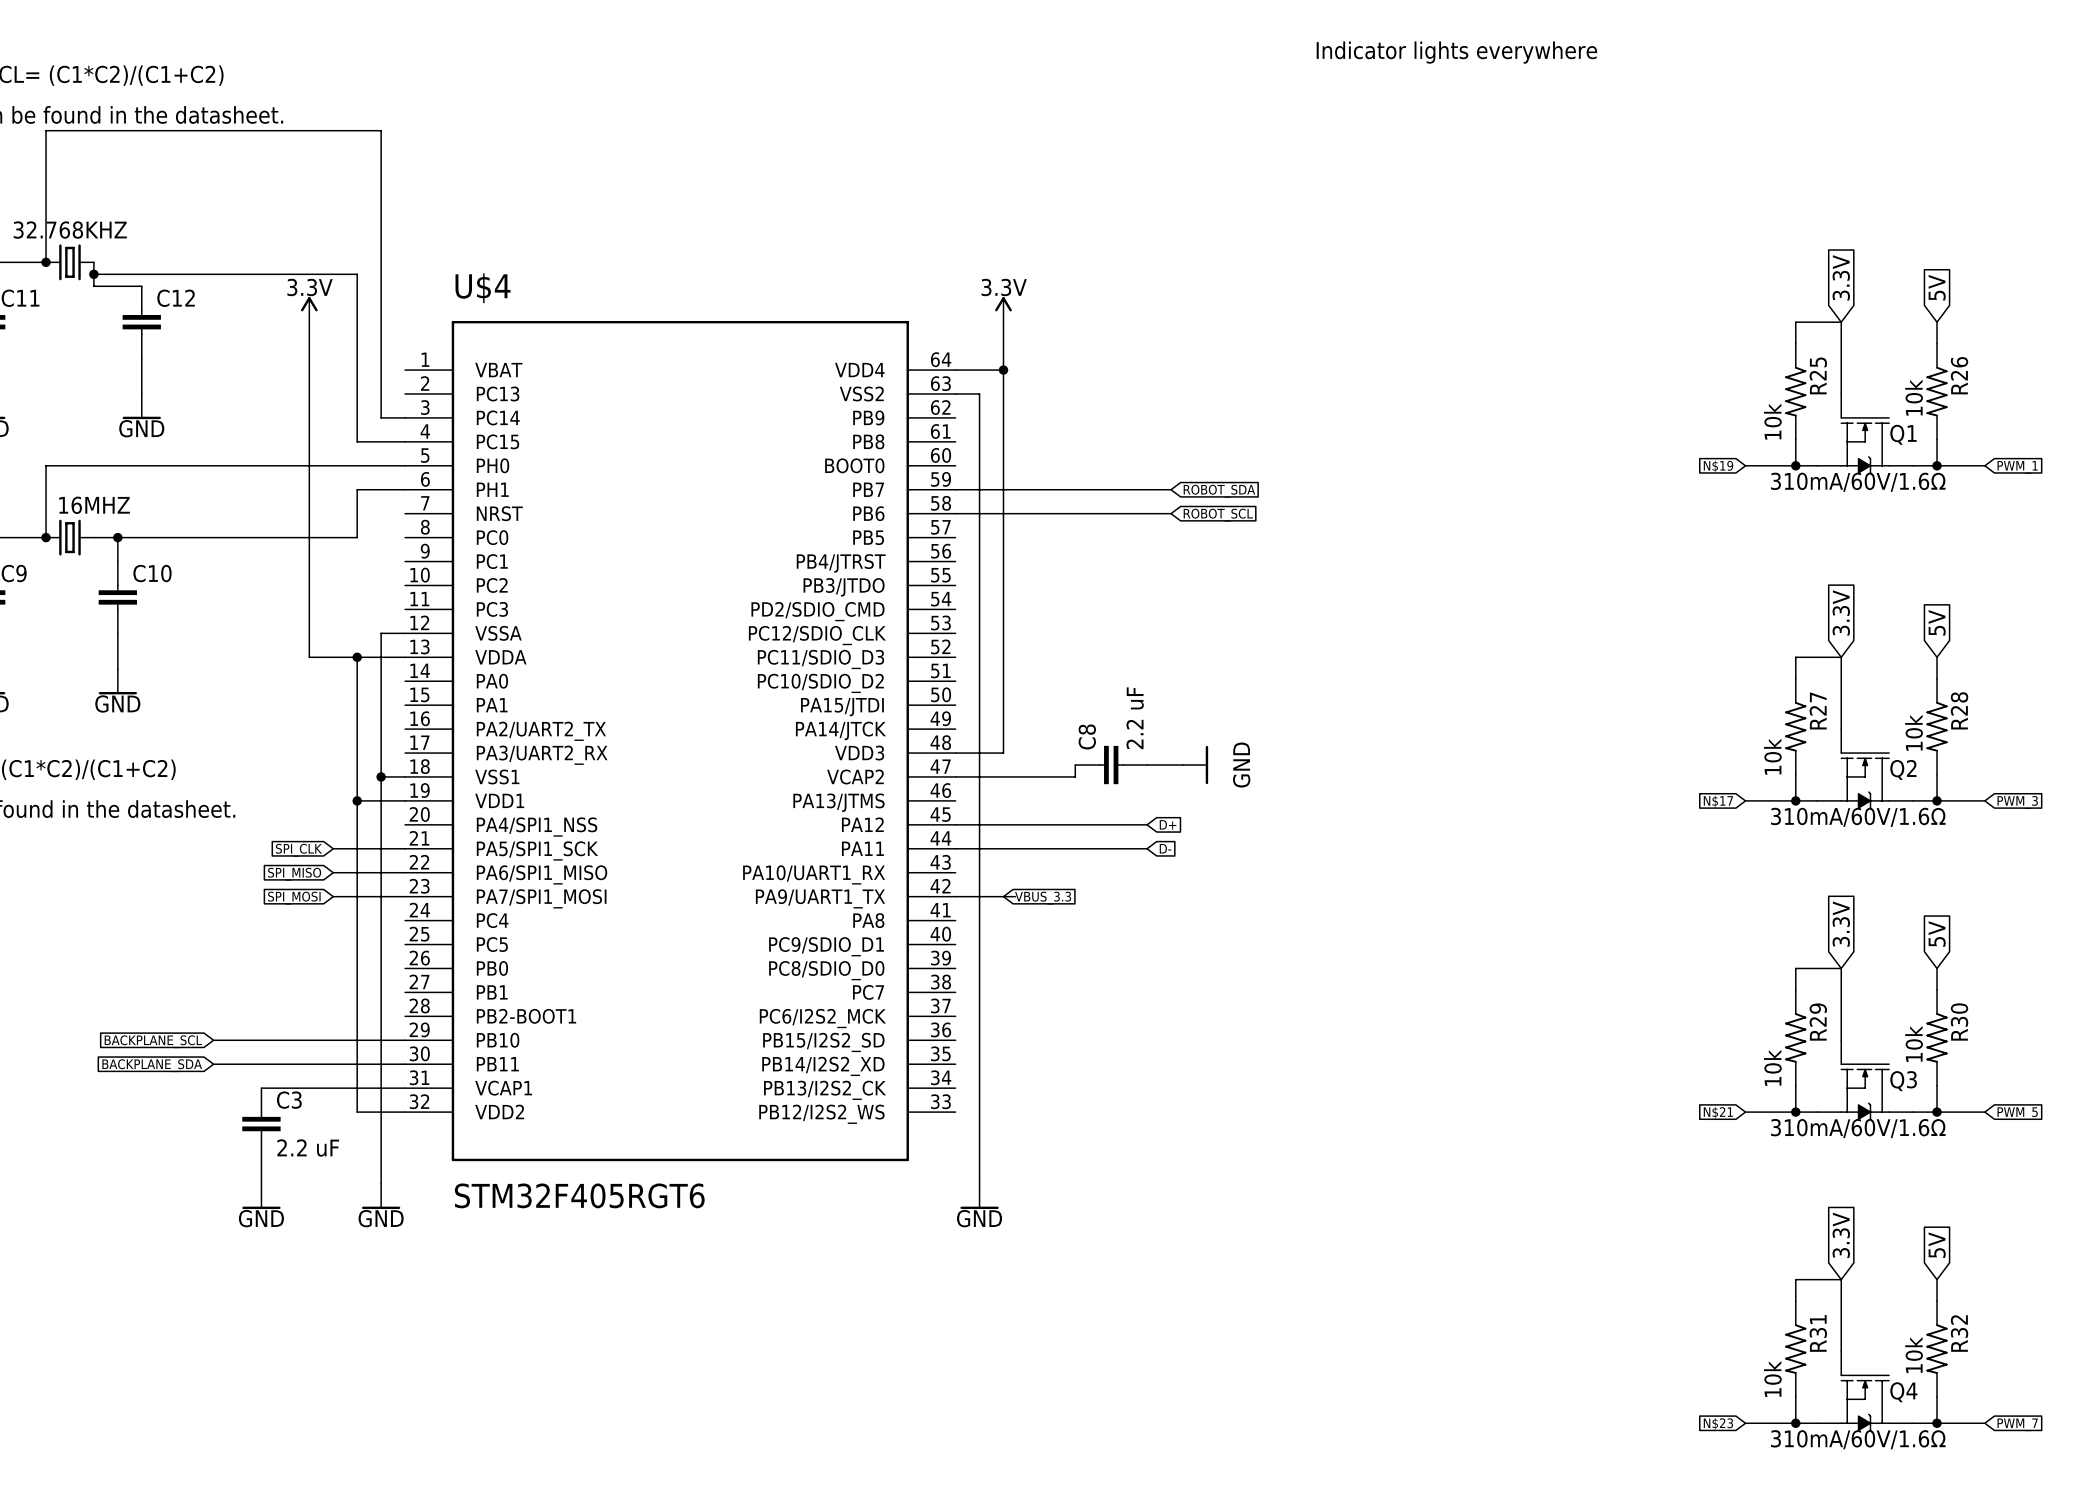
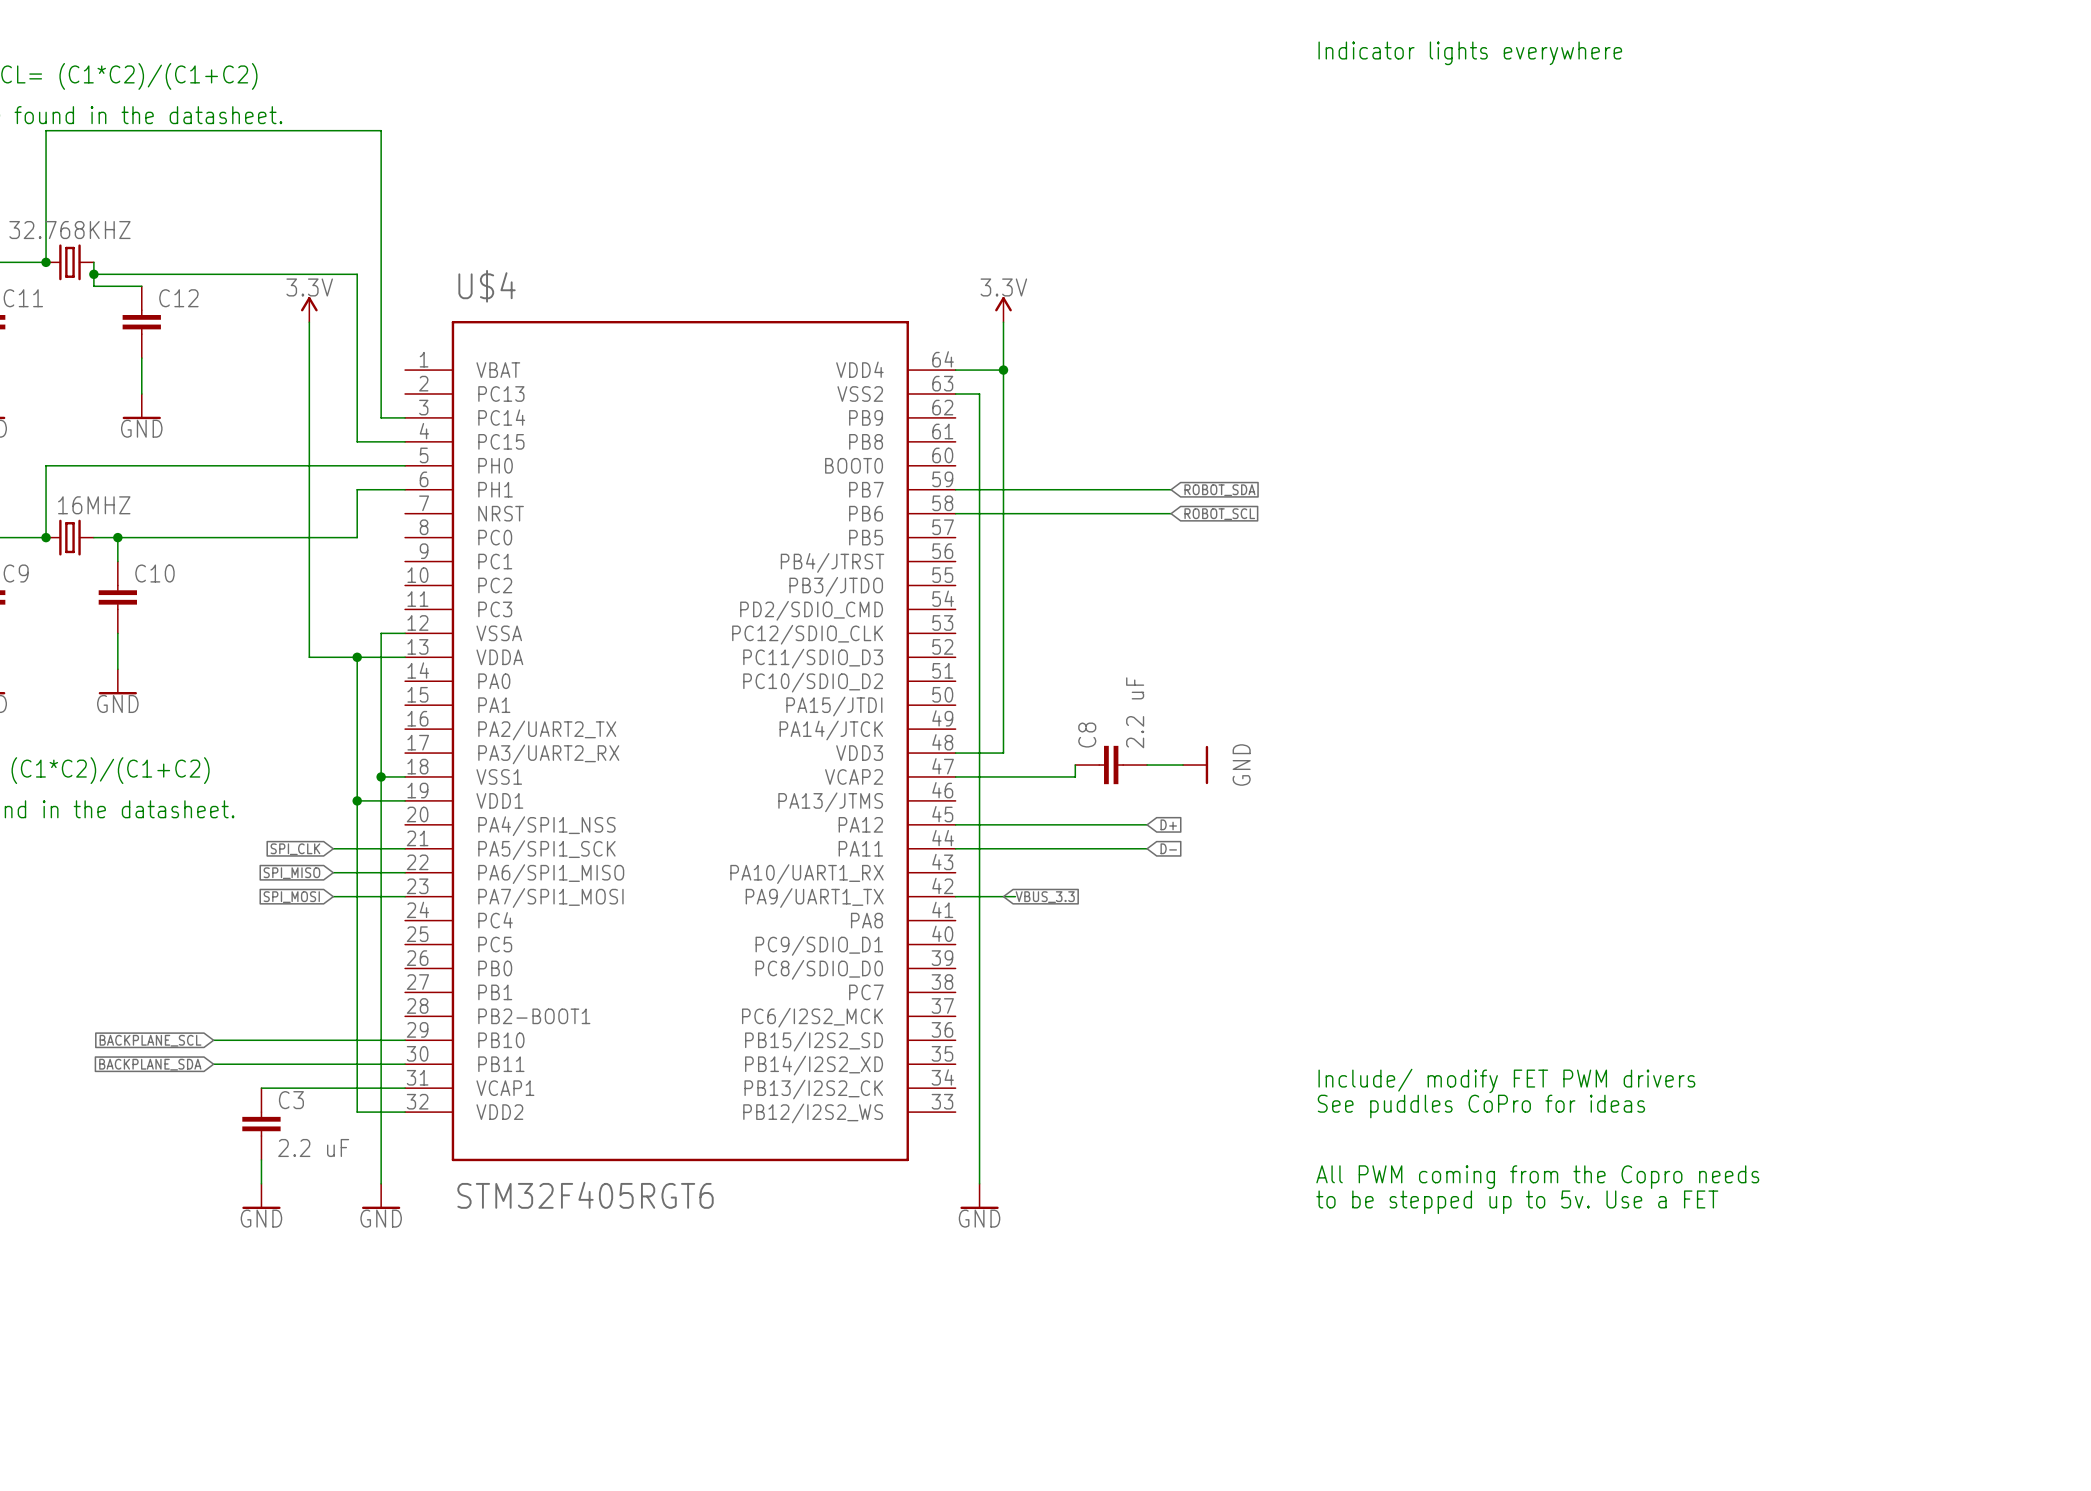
global label: 3.3V (1841, 277) -> none
global label: 5V (1937, 287) -> none
wire: (1937, 322) (1937, 343) -> none
wire: (1795, 343) (1795, 322) (1841, 322) (1841, 393) -> none
R25: 10k (1795, 391) -> none
R26: 10k (1937, 391) -> none
Q1: 310mA/60V/1.6Ω (1865, 434) -> none
wire: (1795, 439) (1795, 465) -> none
wire: (1937, 439) (1937, 465) -> none
wire: (1745, 465) (1817, 465) -> none
junction: (1795, 465) -> none
wire: (1913, 465) (1984, 465) -> none
junction: (1937, 465) -> none
global label: N$19 (1718, 466) -> none
global label: PWM_1 (2017, 467) -> none
global label: 3.3V (1841, 612) -> none
global label: 5V (1937, 622) -> none
wire: (1937, 657) (1937, 678) -> none
wire: (1795, 678) (1795, 657) (1841, 657) (1841, 729) -> none
R27: 10k (1795, 726) -> none
R28: 10k (1937, 726) -> none
Q2: 310mA/60V/1.6Ω (1865, 769) -> none
wire: (1795, 774) (1795, 800) -> none
wire: (1937, 774) (1937, 800) -> none
wire: (1745, 800) (1817, 800) -> none
junction: (1795, 800) -> none
wire: (1913, 800) (1984, 800) -> none
junction: (1937, 800) -> none
global label: N$17 (1718, 801) -> none
global label: PWM_3 (2017, 802) -> none
global label: 3.3V (1841, 924) -> none
global label: 5V (1937, 933) -> none
wire: (1937, 968) (1937, 990) -> none
wire: (1795, 990) (1795, 968) (1841, 968) (1841, 1040) -> none
R29: 10k (1795, 1037) -> none
R30: 10k (1937, 1037) -> none
text: none -> Include/ modify FET PWM drivers (1506, 1080)
Q3: 310mA/60V/1.6Ω (1865, 1080) -> none
wire: (1795, 1085) (1795, 1112) -> none
wire: (1937, 1085) (1937, 1112) -> none
text: none -> See puddles CoPro for ideas (1481, 1106)
global label: N$21 (1718, 1112) -> none
wire: (1745, 1112) (1817, 1112) -> none
junction: (1795, 1112) -> none
wire: (1913, 1112) (1984, 1112) -> none
junction: (1937, 1112) -> none
global label: PWM_5 (2017, 1113) -> none
text: none -> All PWM coming from the Copro needs (1537, 1177)
text: none -> to be stepped up to 5v. Use a FET (1517, 1202)
global label: 3.3V (1841, 1235) -> none
global label: 5V (1937, 1245) -> none
wire: (1937, 1279) (1937, 1301) -> none
wire: (1795, 1301) (1795, 1279) (1841, 1279) (1841, 1351) -> none
R31: 10k (1795, 1349) -> none
R32: 10k (1937, 1349) -> none
Q4: 310mA/60V/1.6Ω (1865, 1392) -> none
wire: (1795, 1396) (1795, 1423) -> none
wire: (1937, 1396) (1937, 1423) -> none
wire: (1745, 1423) (1817, 1423) -> none
junction: (1795, 1423) -> none
wire: (1913, 1423) (1984, 1423) -> none
junction: (1937, 1423) -> none
global label: N$23 (1718, 1424) -> none
global label: PWM_7 (2017, 1424) -> none

